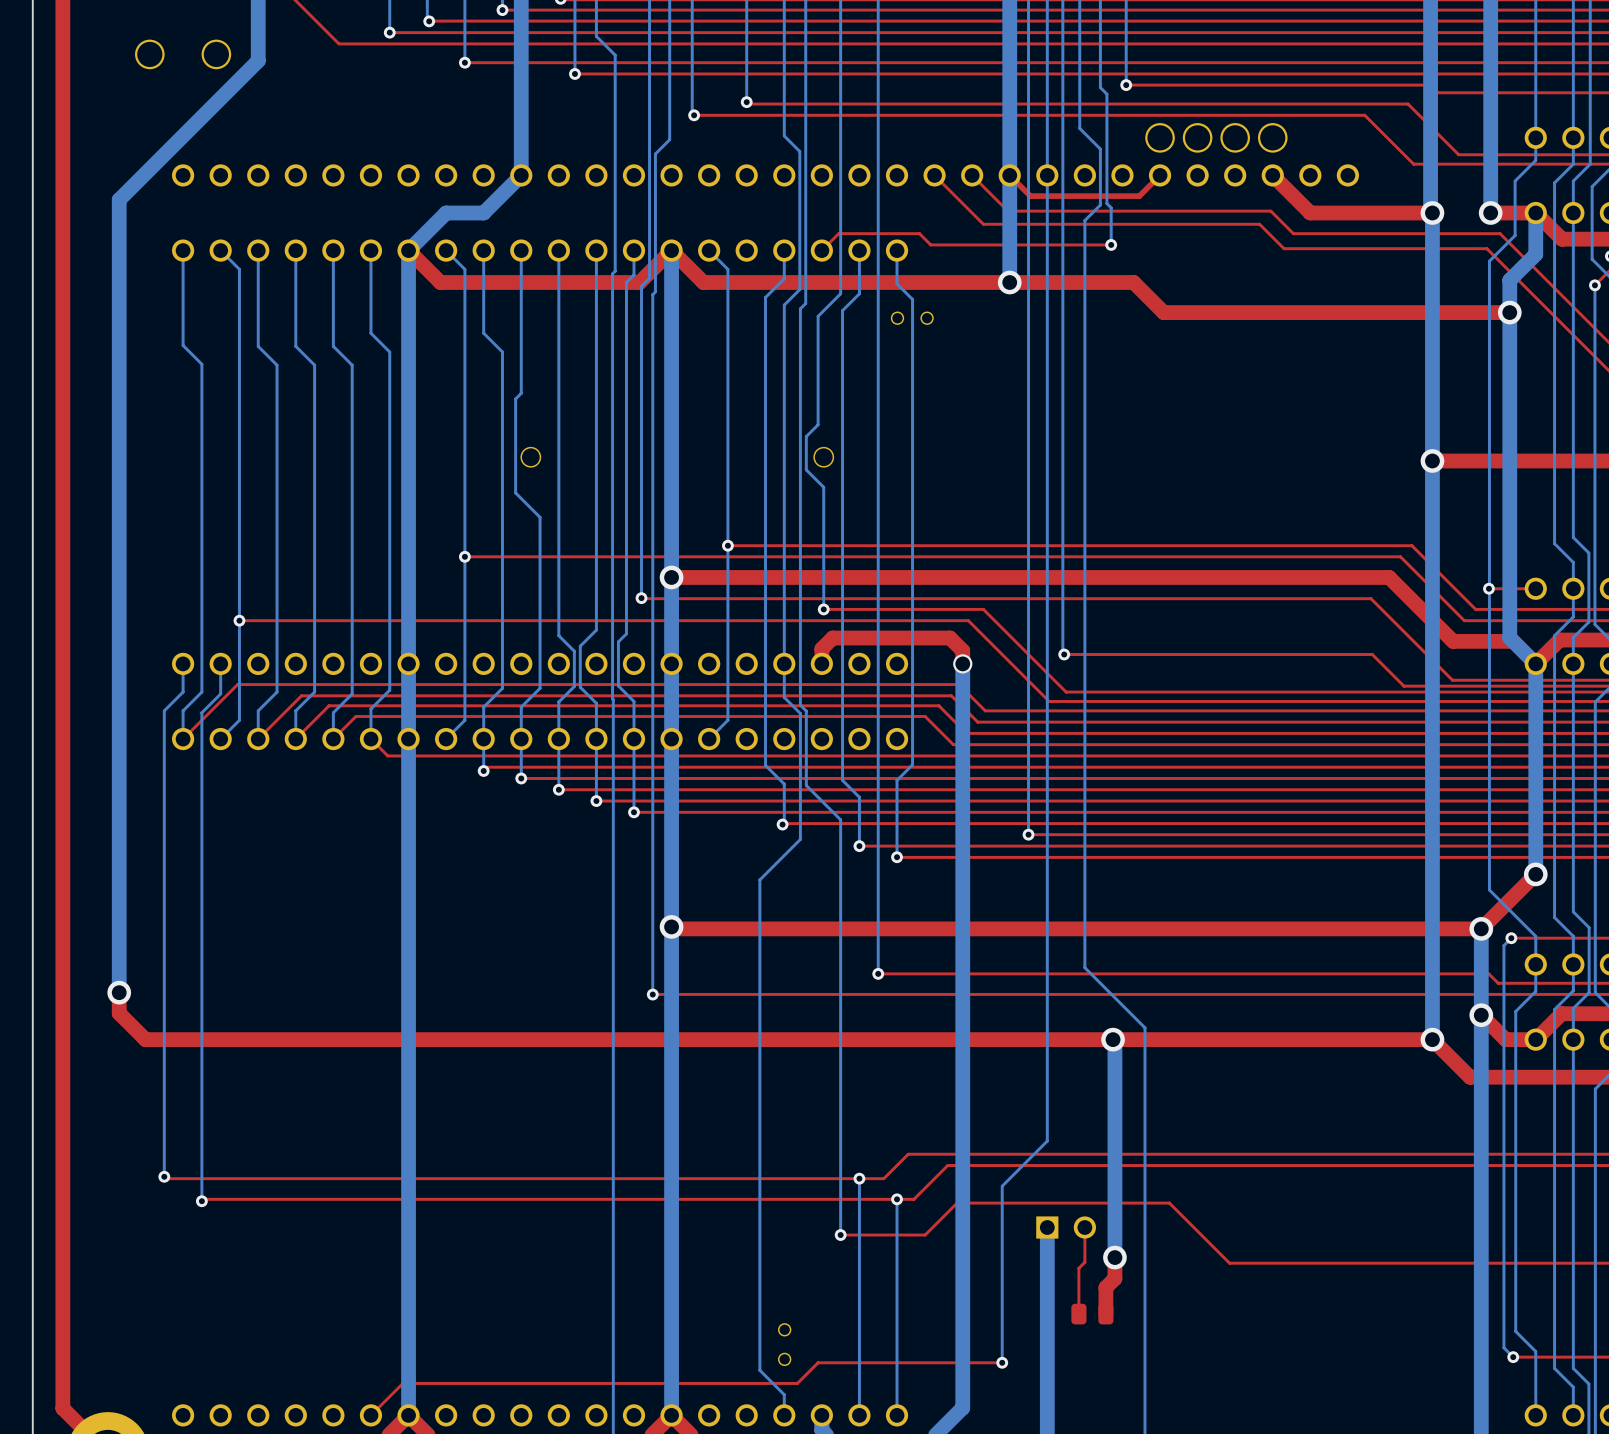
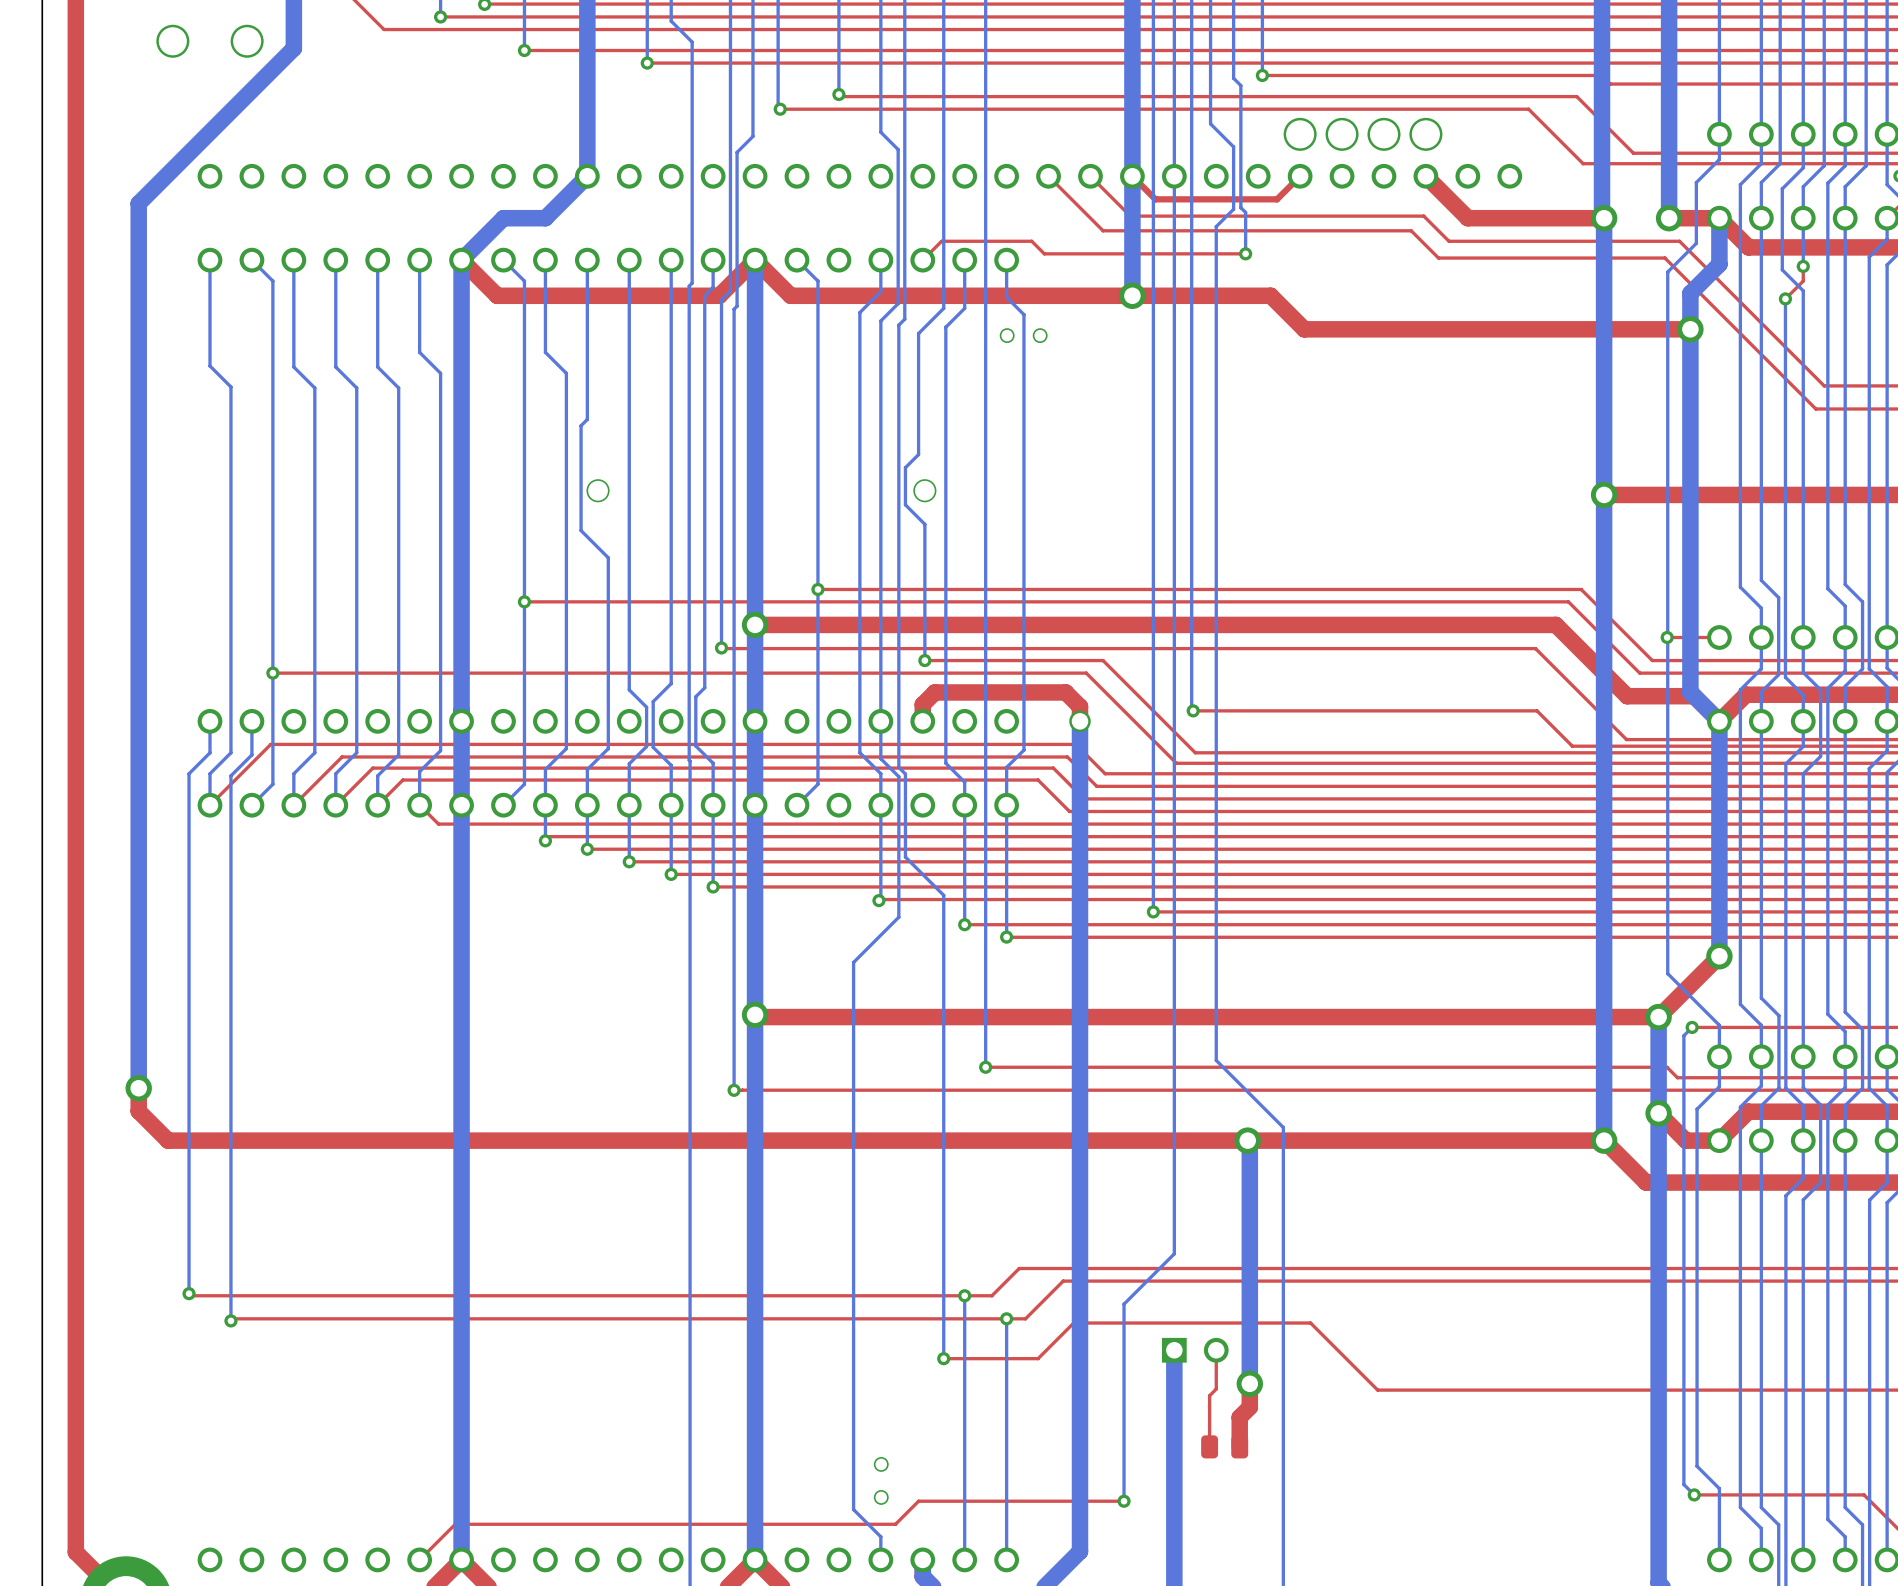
bottom track: (912, 689) (912, 764) (897, 780) -> (1023, 750) (1006, 767) (1006, 851)
bottom track: (765, 692) (765, 765) (784, 784) -> (859, 752) (880, 773) (880, 855)
bottom track: (842, 701) (842, 780) (859, 797) -> (945, 763) (964, 782) (964, 870)

